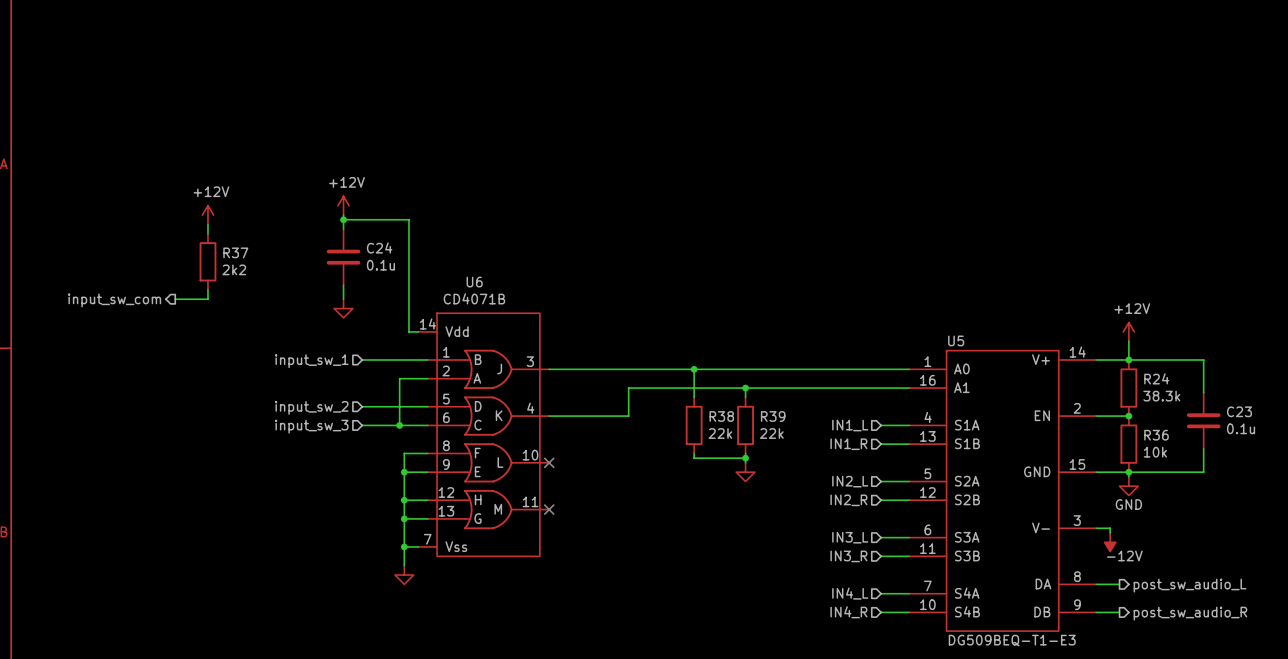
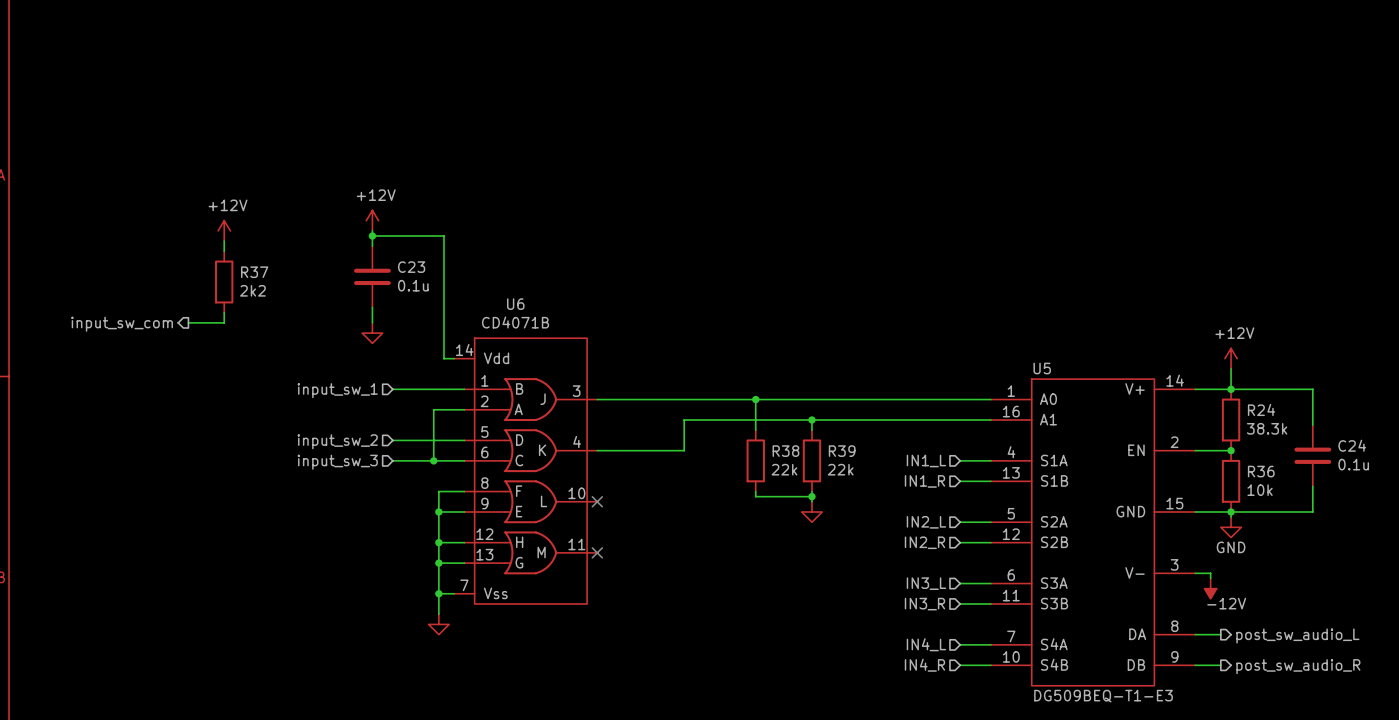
C24 name: C24 (379, 247) -> C23 (411, 267)
C23 name: C23 (1239, 411) -> C24 (1352, 445)

